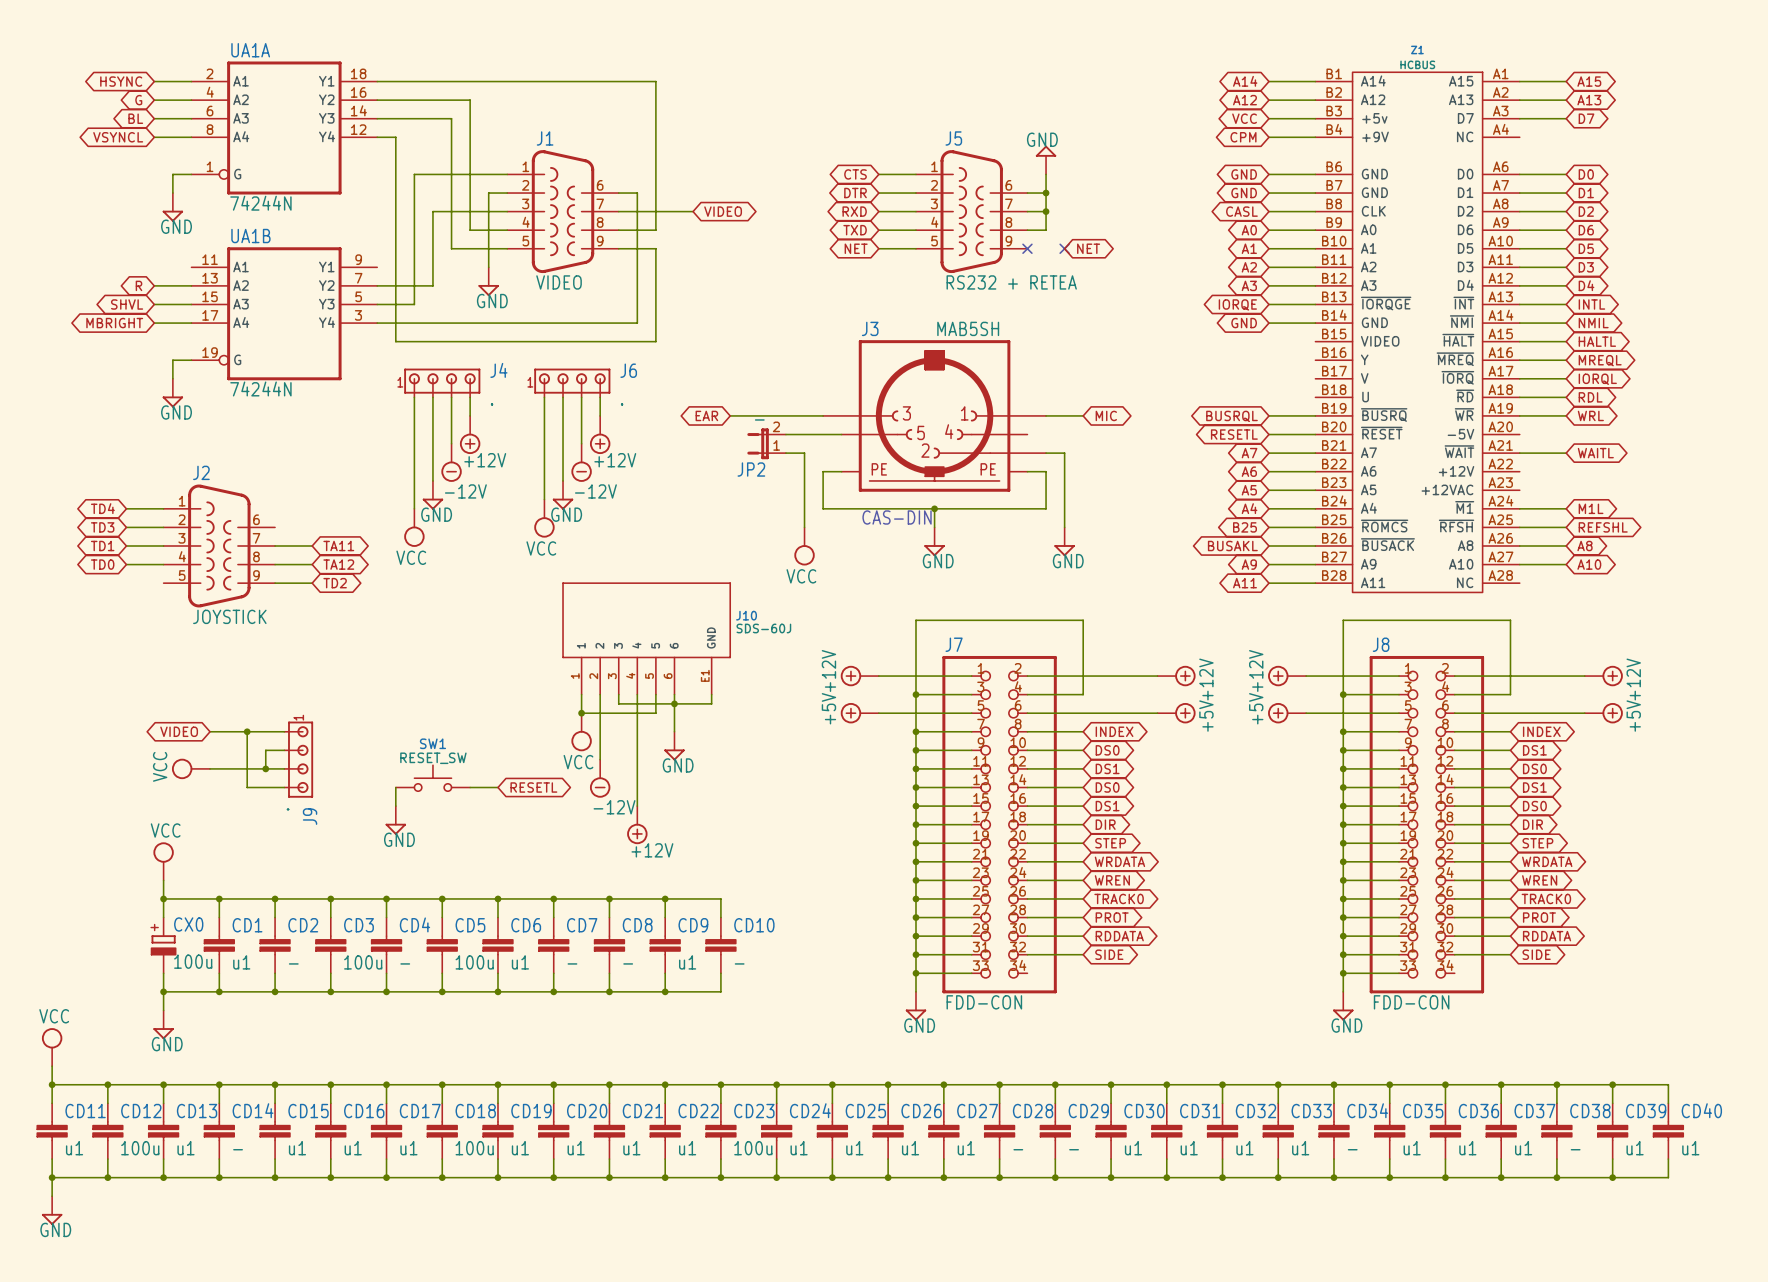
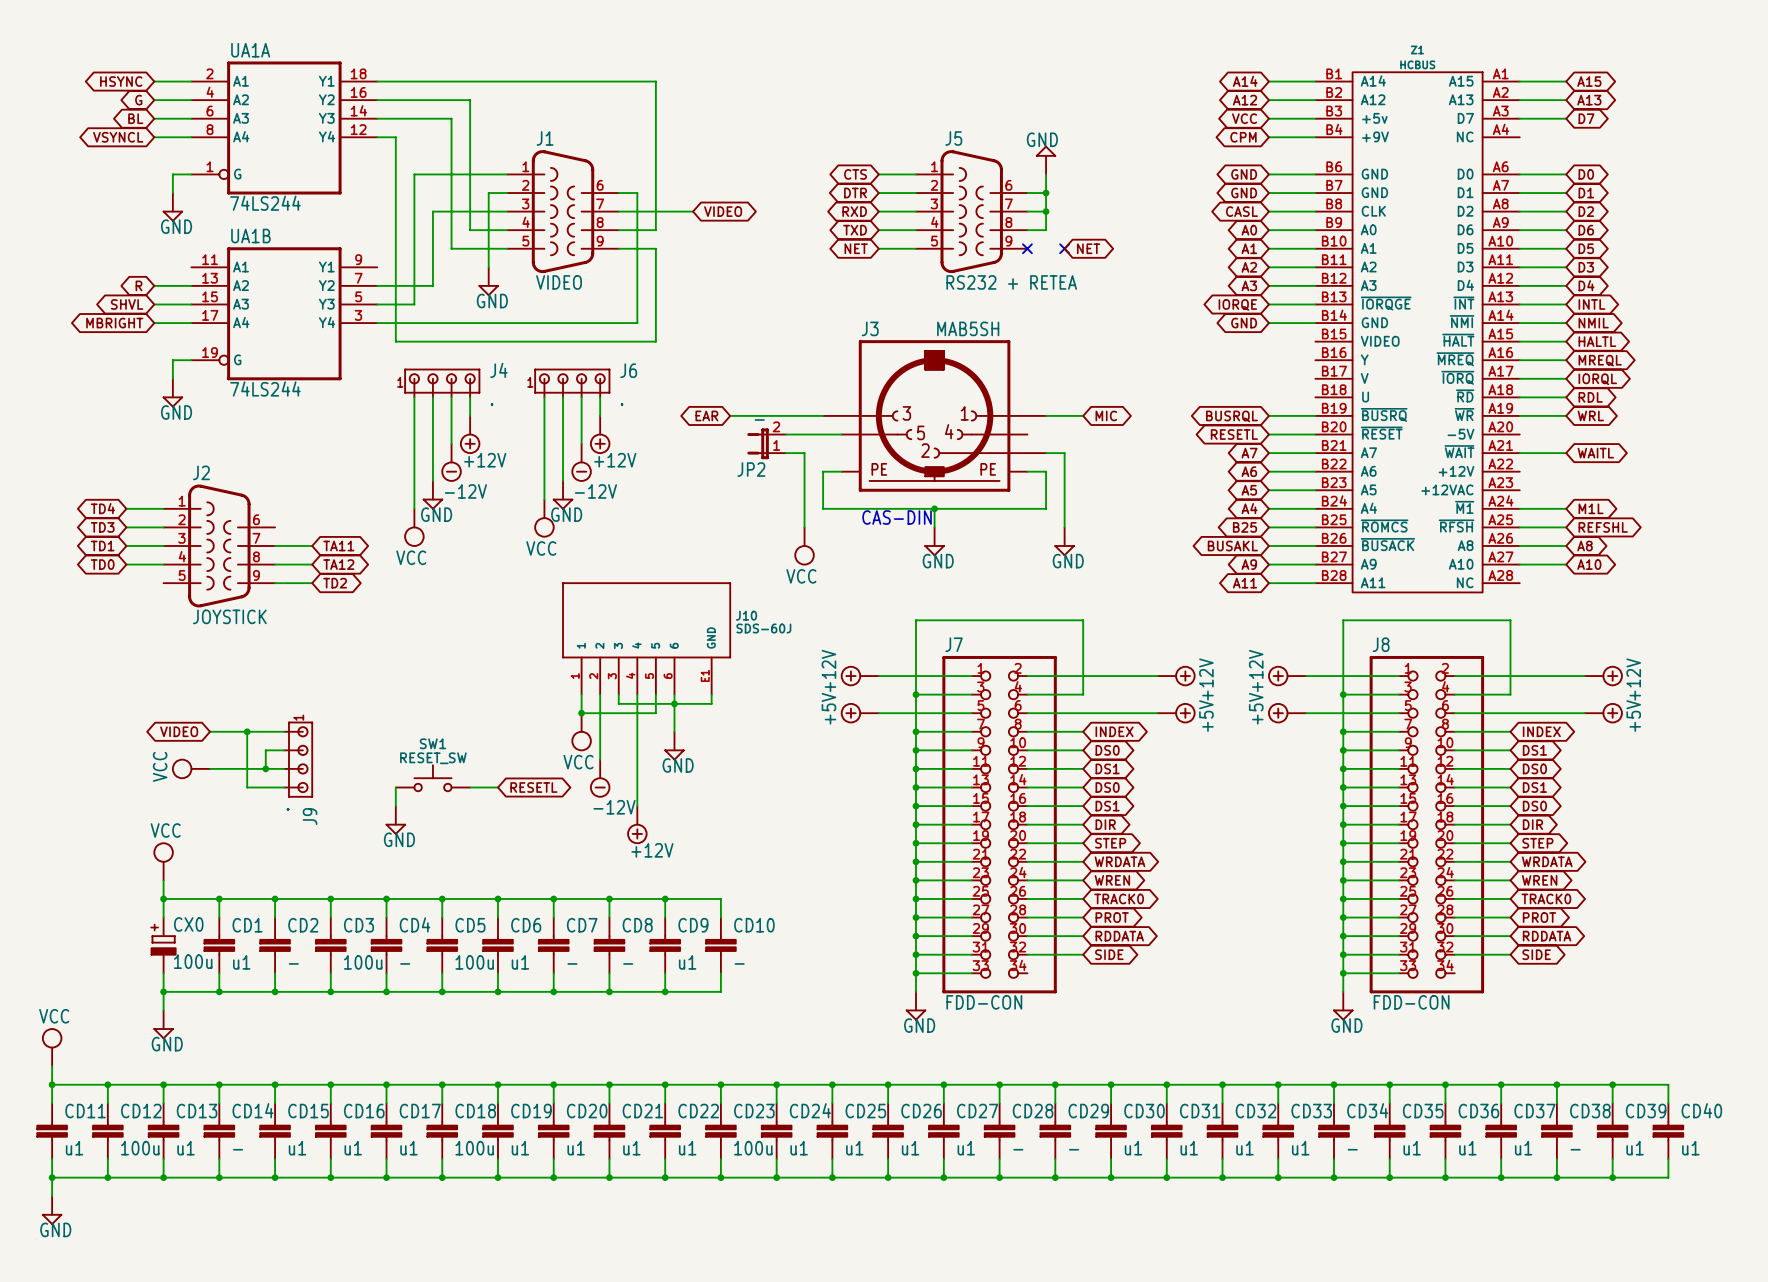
UA1A value: 74244N (260, 203) -> 74LS244 (265, 203)
UA1B value: 74244N (260, 388) -> 74LS244 (265, 388)

